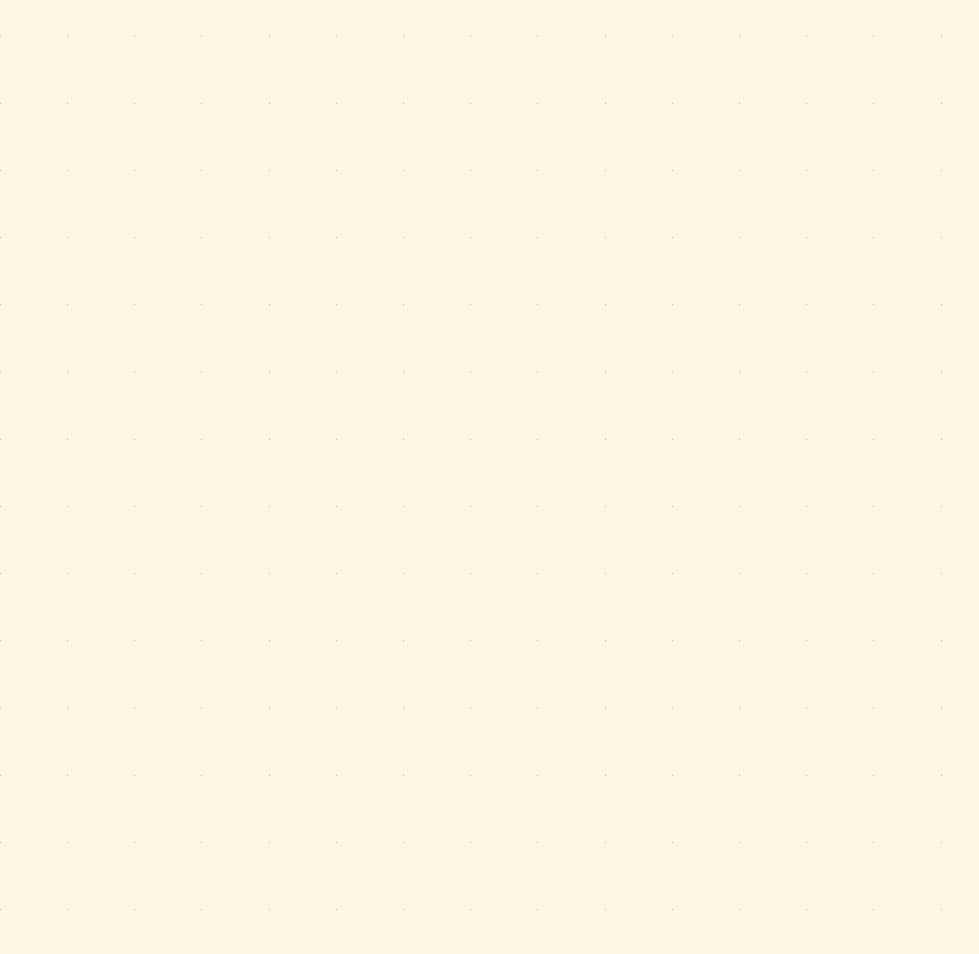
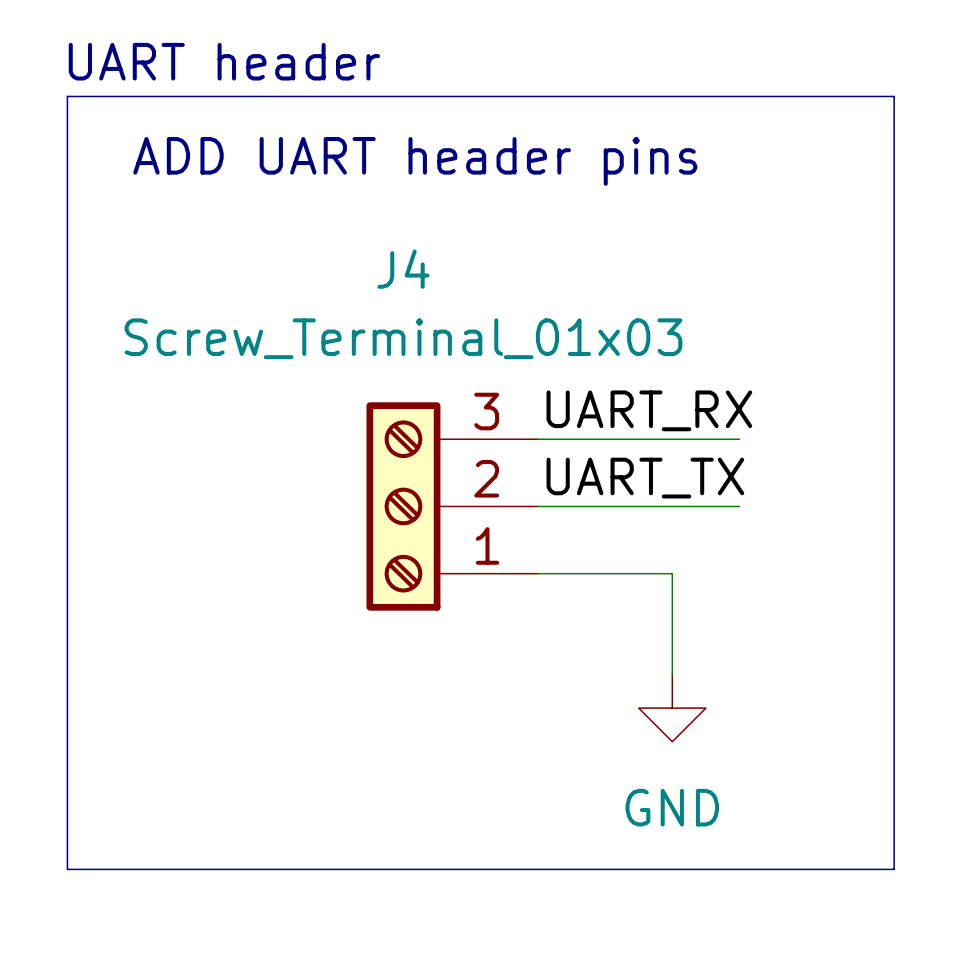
text: none -> UART header (224, 61)
line: none -> (67, 96) (894, 96) (894, 869) (67, 869) (67, 96)
text: none -> ADD UART header pins (415, 161)
label: none -> UART_RX (649, 410)
wire: none -> (537, 439) (739, 439)
label: none -> UART_TX (645, 478)
J4: none -> Screw_Terminal_01x03 (452, 506)
wire: none -> (537, 506) (739, 506)
wire: none -> (537, 573) (672, 573) (672, 674)
power symbol: none -> GND (672, 708)

